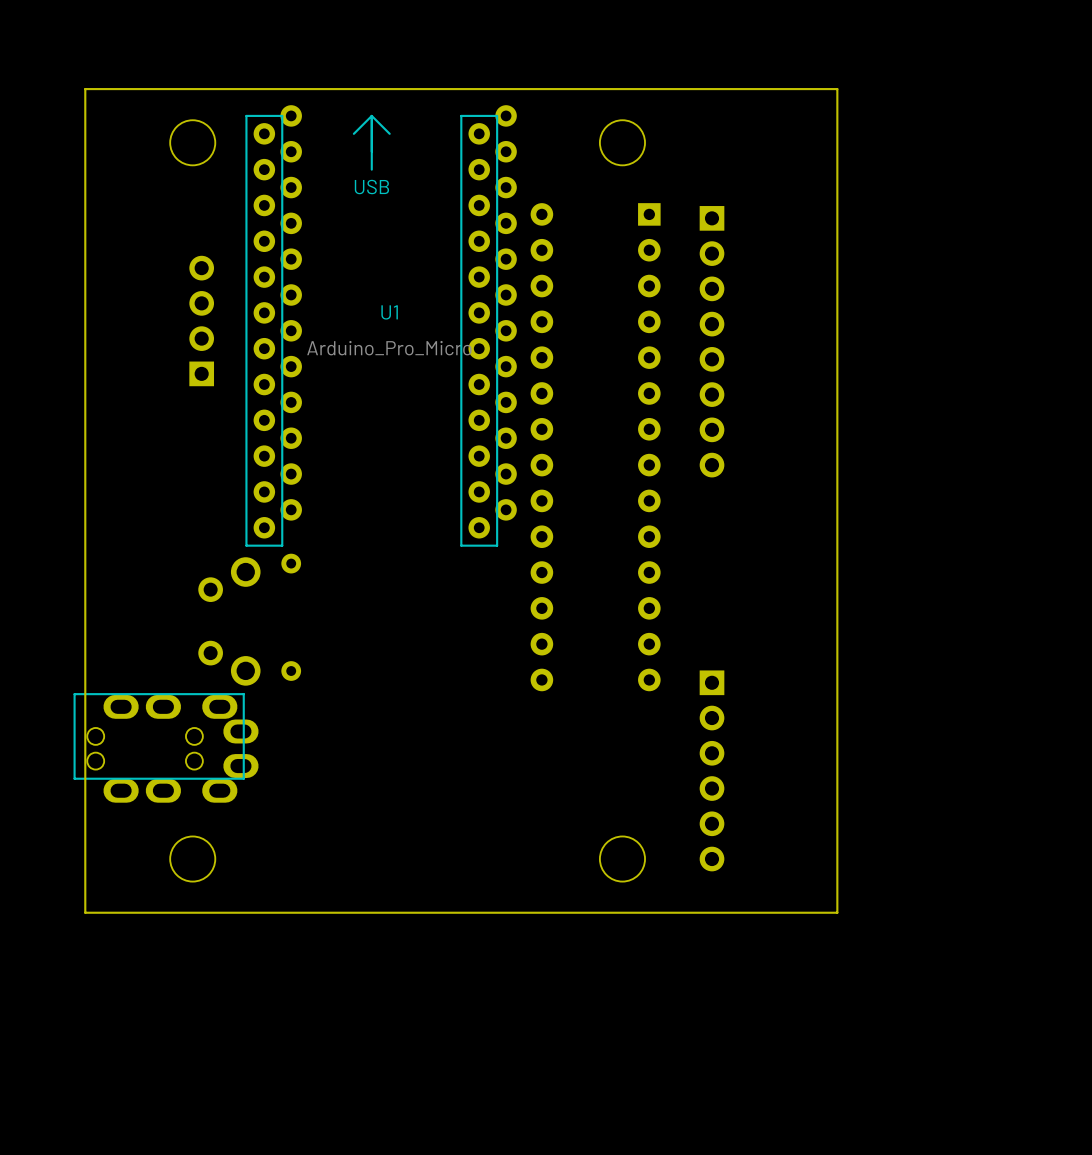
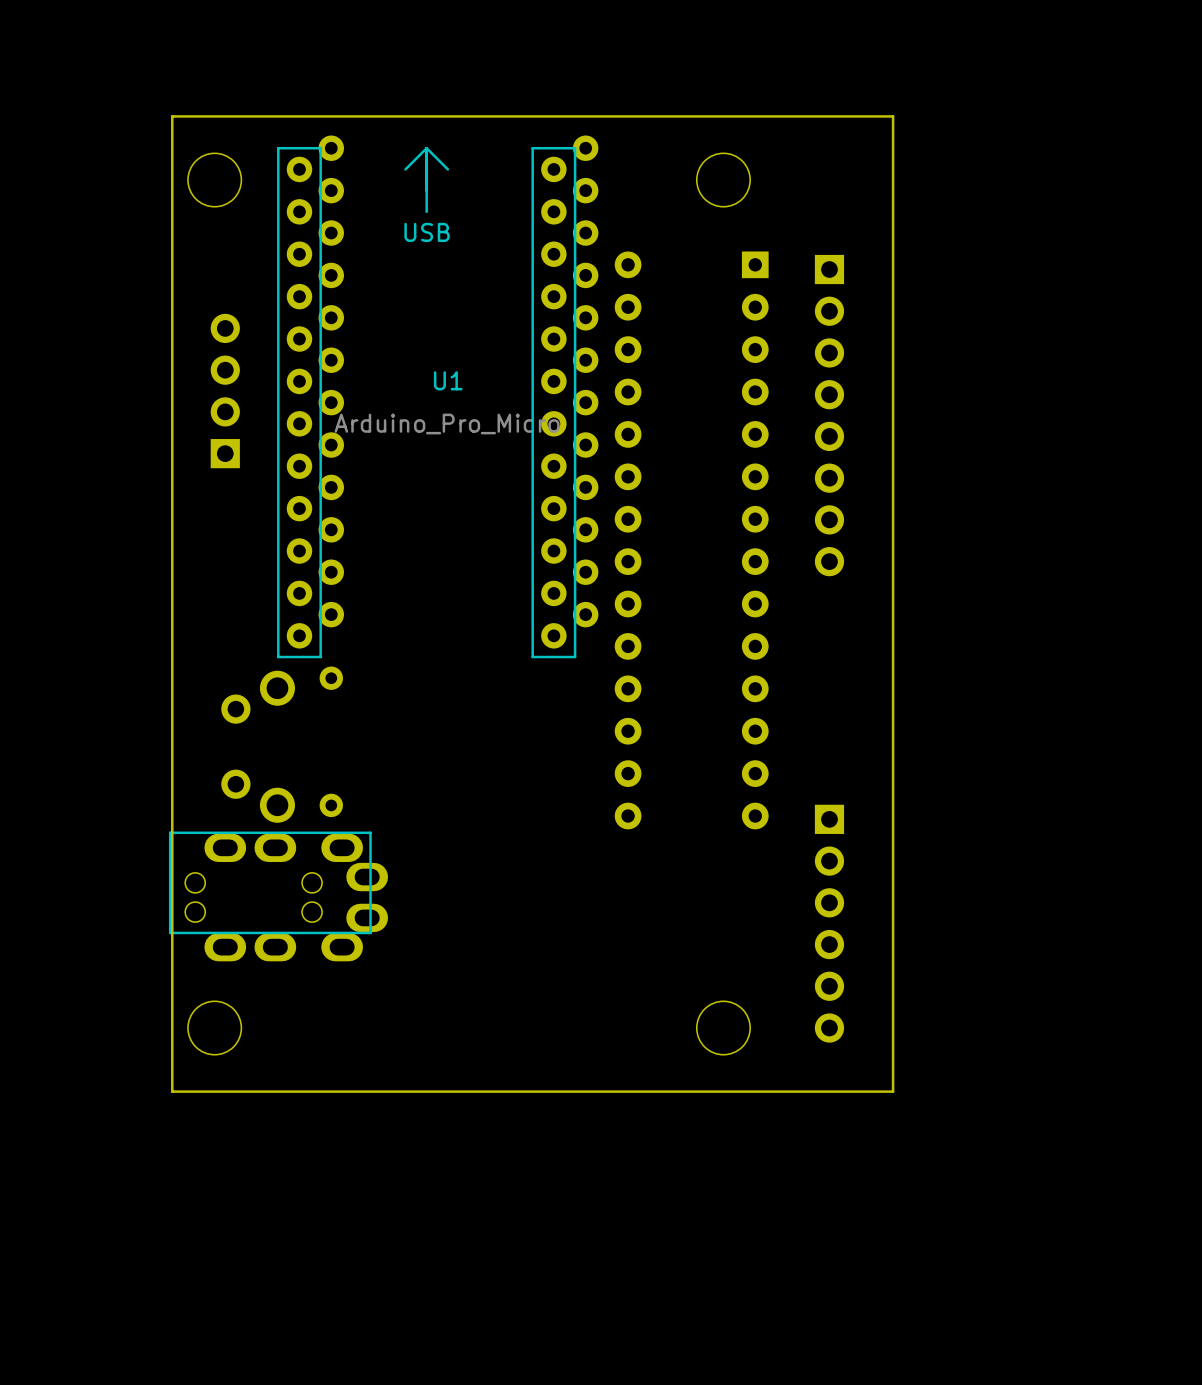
board edge: (156, 89) (85, 89) (85, 912) (156, 912) -> (172, 116) (172, 1091)
board edge: (765, 89) (837, 89) (837, 912) (765, 912) -> (893, 116) (893, 1091)
part position: (166, 747) -> (278, 896)

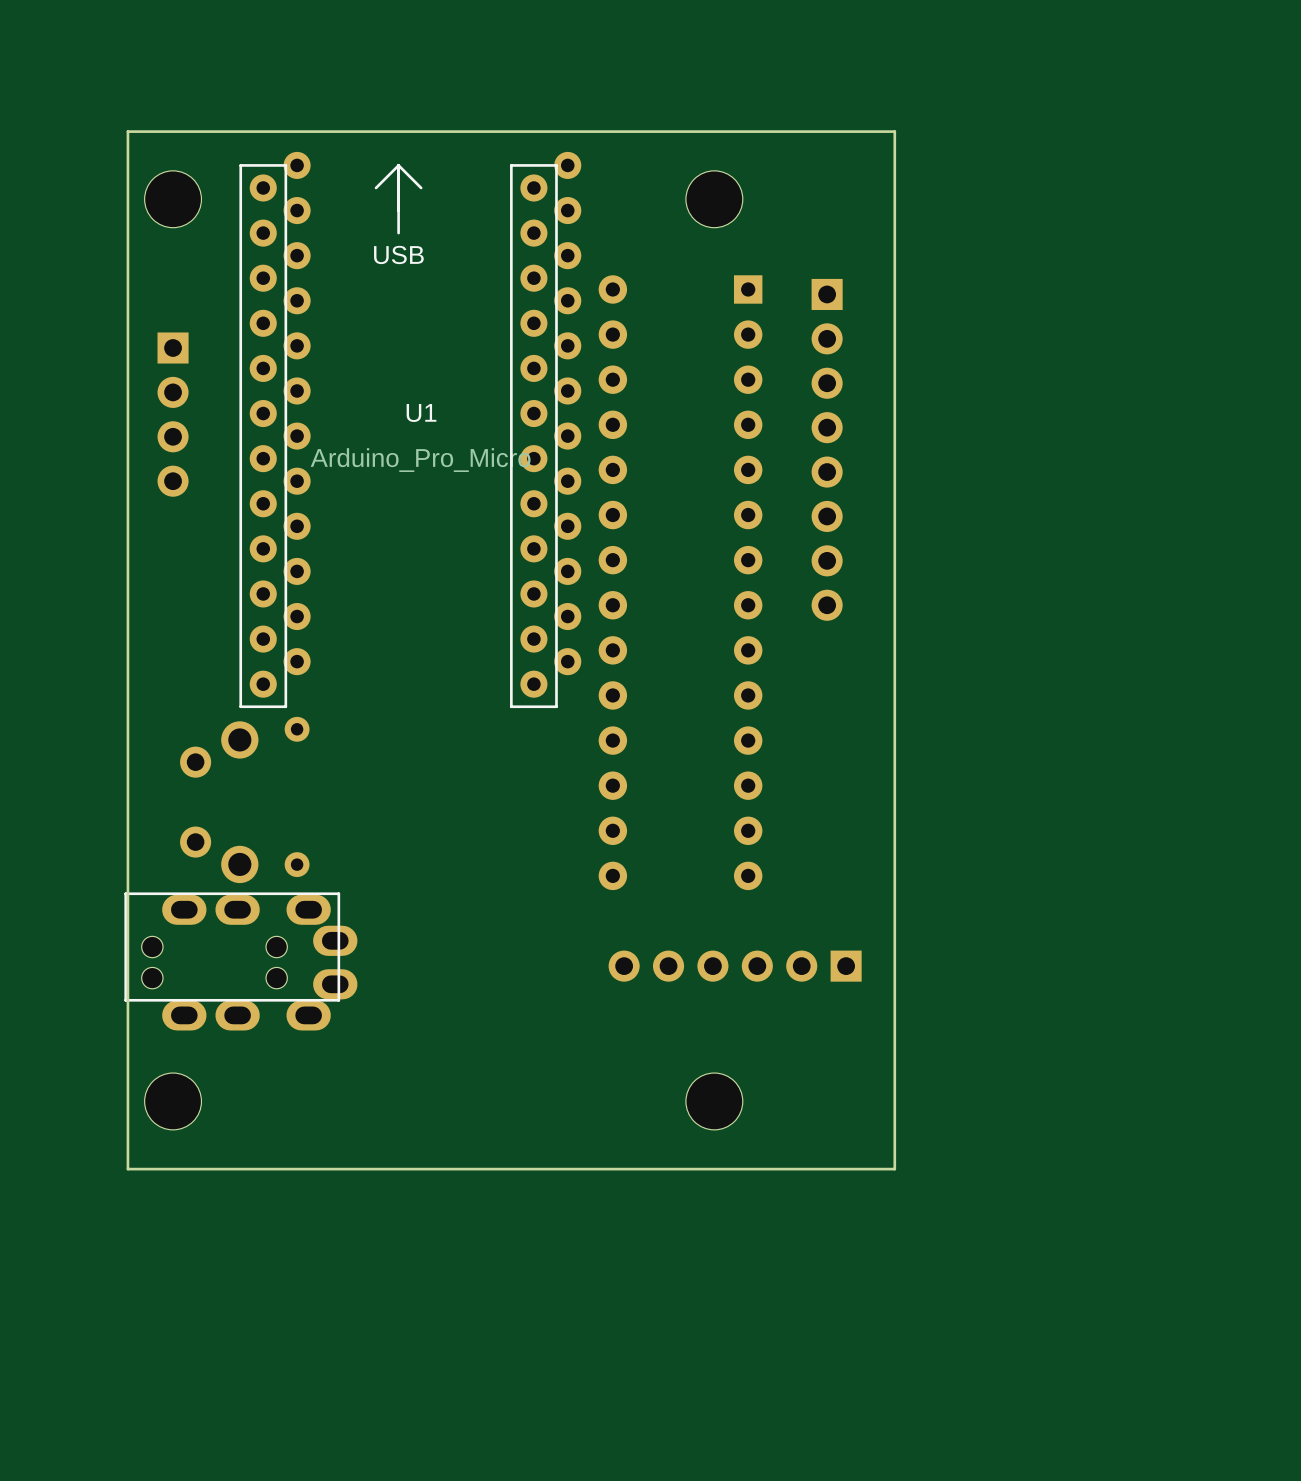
part rotation: 0° (225, 391) -> 180° (173, 414)
part rotation: 0° (829, 923) -> 90° clockwise (735, 966)

